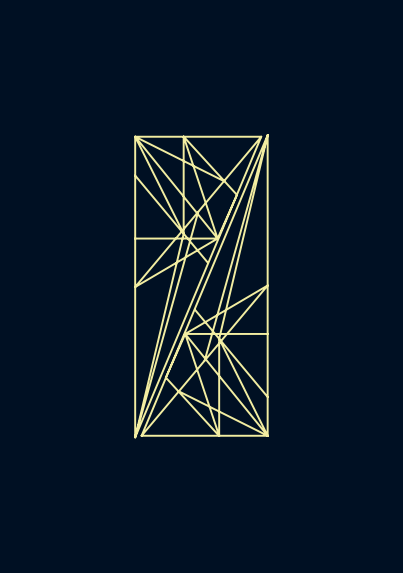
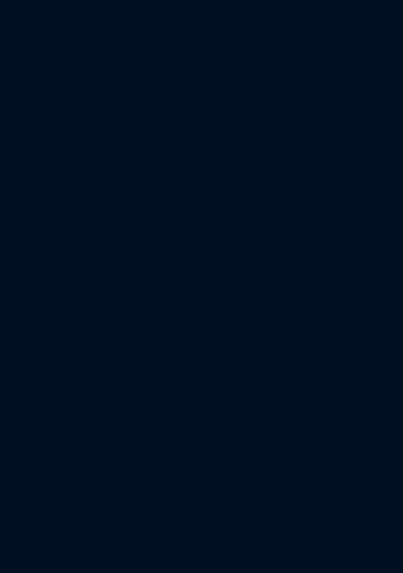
line: (267, 135) (267, 435) -> none
line: (267, 135) (219, 338) -> none
line: (267, 135) (204, 360) -> none
line: (267, 135) (141, 435) -> none
line: (135, 136) (222, 180) -> none
line: (135, 136) (183, 233) -> none
line: (135, 136) (217, 238) -> none
line: (135, 136) (135, 437) -> none
line: (183, 136) (217, 238) -> none
line: (261, 136) (135, 136) -> none
line: (261, 136) (135, 287) (217, 238) -> none
line: (261, 136) (135, 437) -> none
line: (135, 175) (207, 262) -> none
line: (198, 211) (135, 437) -> none
line: (183, 233) (183, 136) (236, 194) (217, 238) -> none
line: (183, 233) (135, 437) -> none
line: (217, 238) (135, 238) -> none
line: (194, 309) (267, 396) -> none
line: (185, 333) (267, 285) (141, 435) -> none
line: (185, 333) (267, 435) -> none
line: (185, 333) (219, 435) -> none
line: (185, 333) (165, 377) (219, 435) -> none
line: (267, 333) (185, 333) -> none
line: (219, 338) (267, 435) -> none
line: (219, 338) (219, 435) -> none
line: (180, 392) (267, 435) -> none
line: (267, 435) (141, 435) -> none

